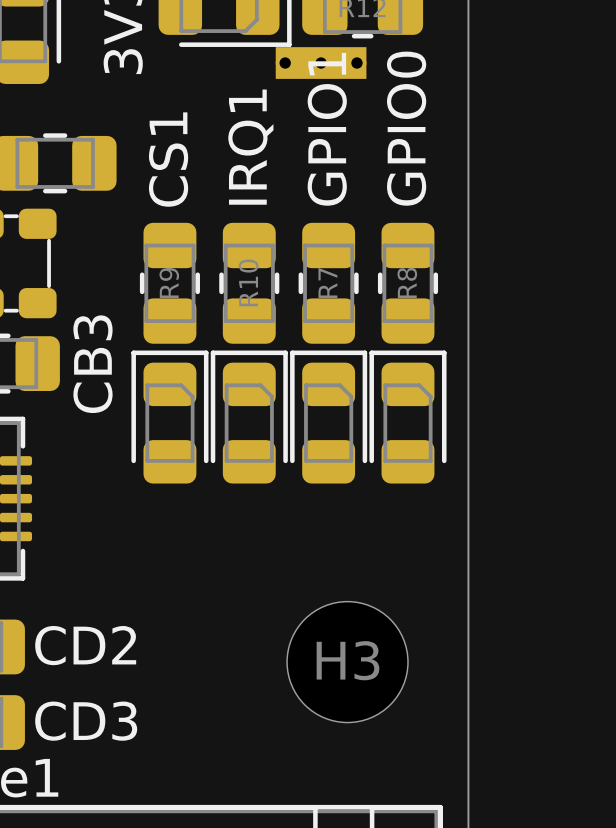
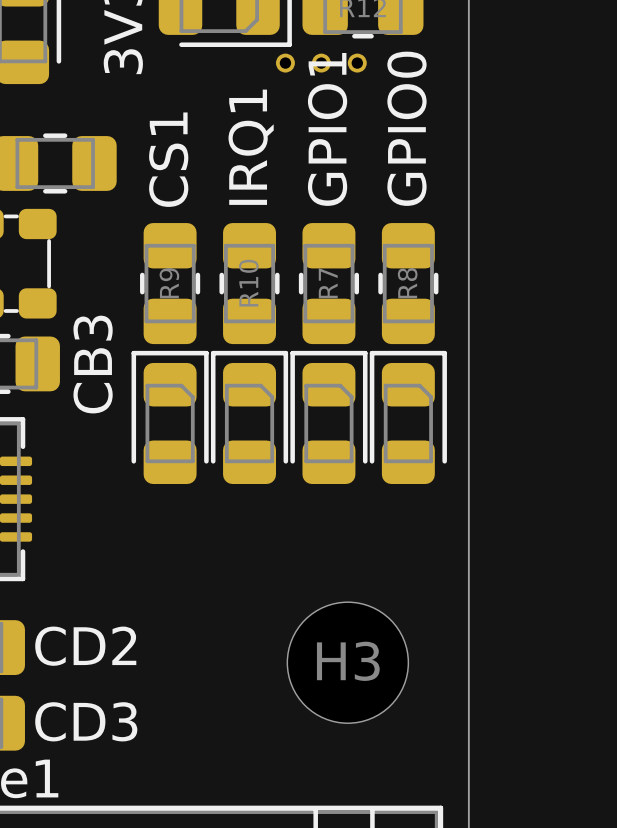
part footprint: [275, 47, 367, 79] -> [275, 53, 367, 73]

